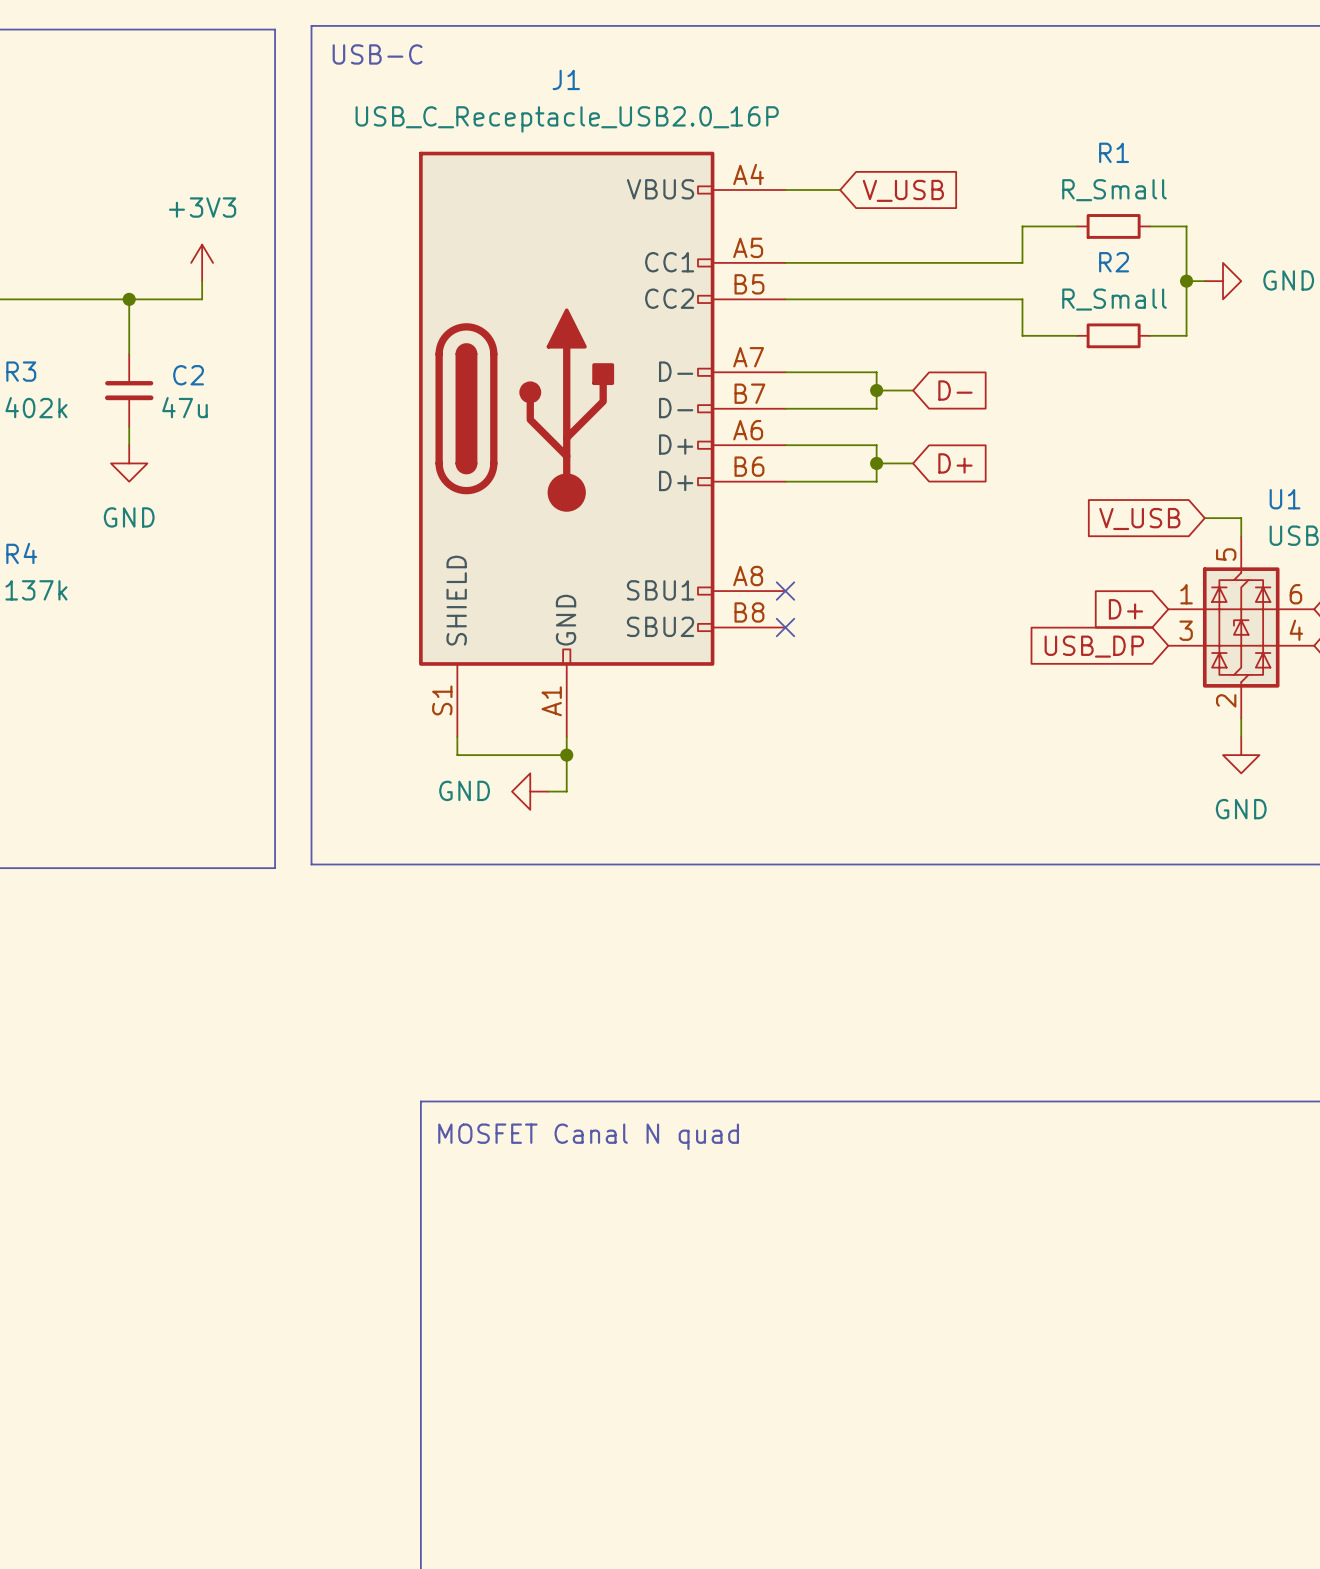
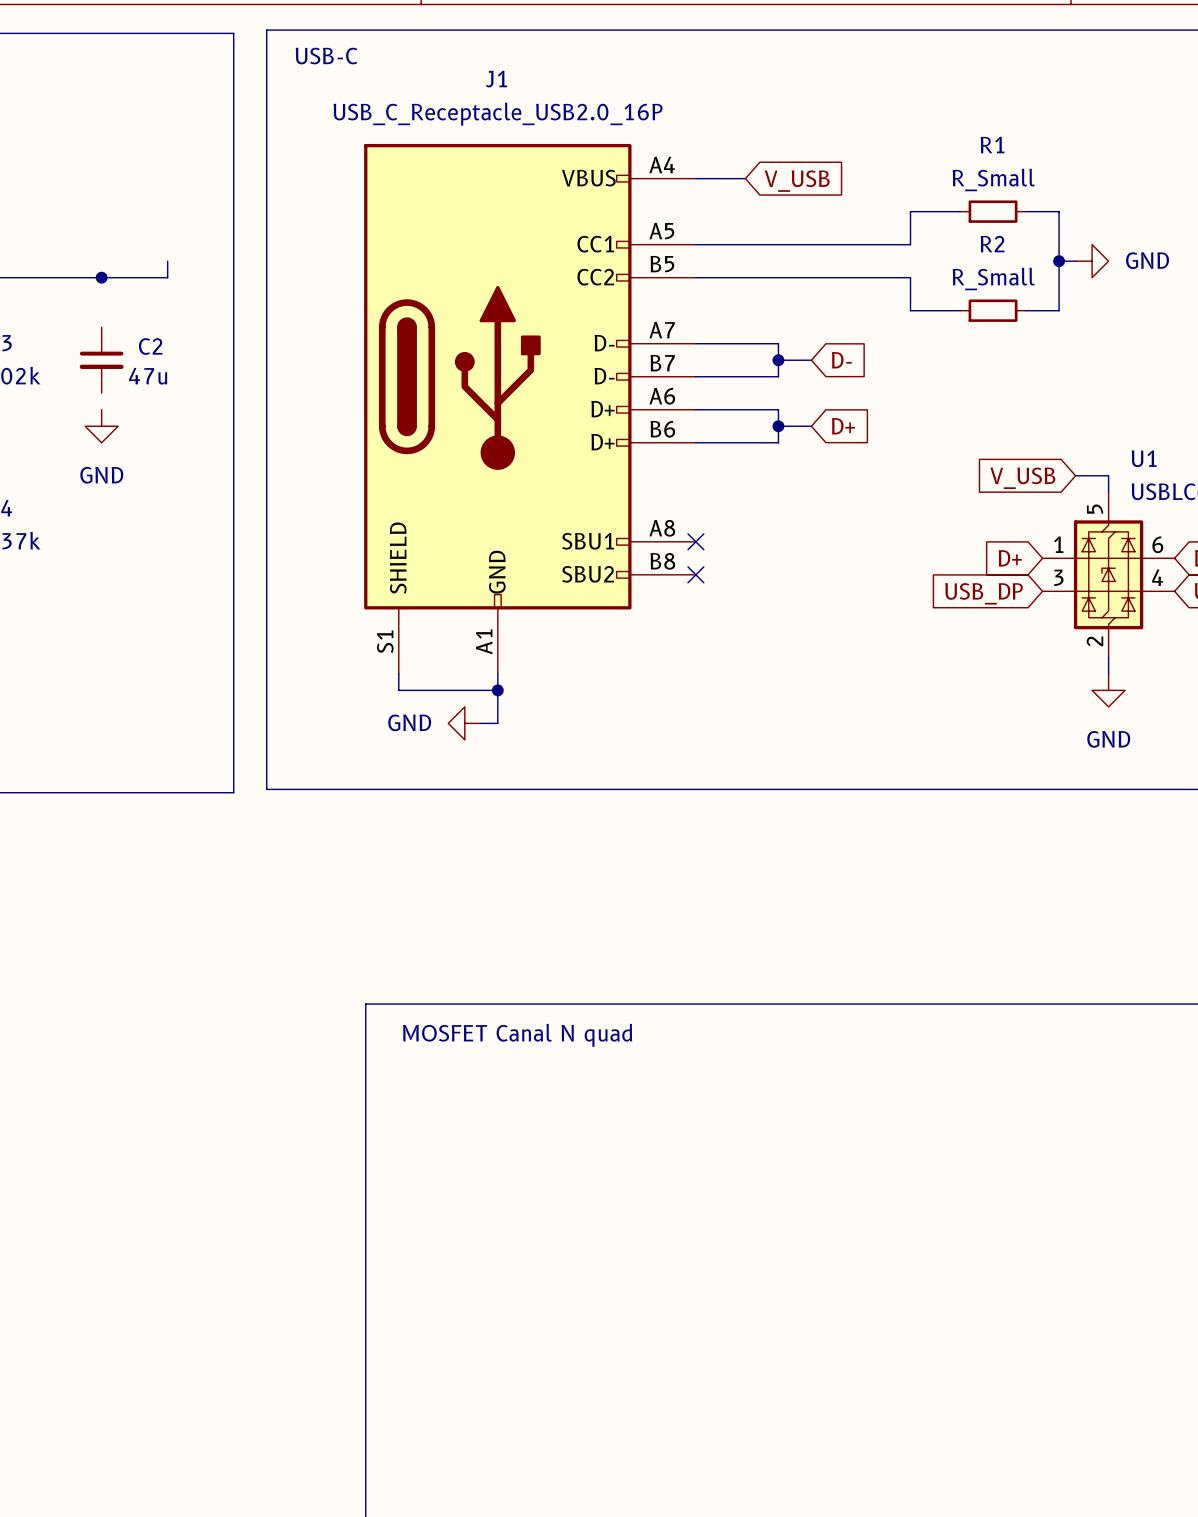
power symbol: +3V3 (202, 262) -> none
wire: (129, 299) (129, 354) -> none
wire: (129, 426) (129, 445) -> none

